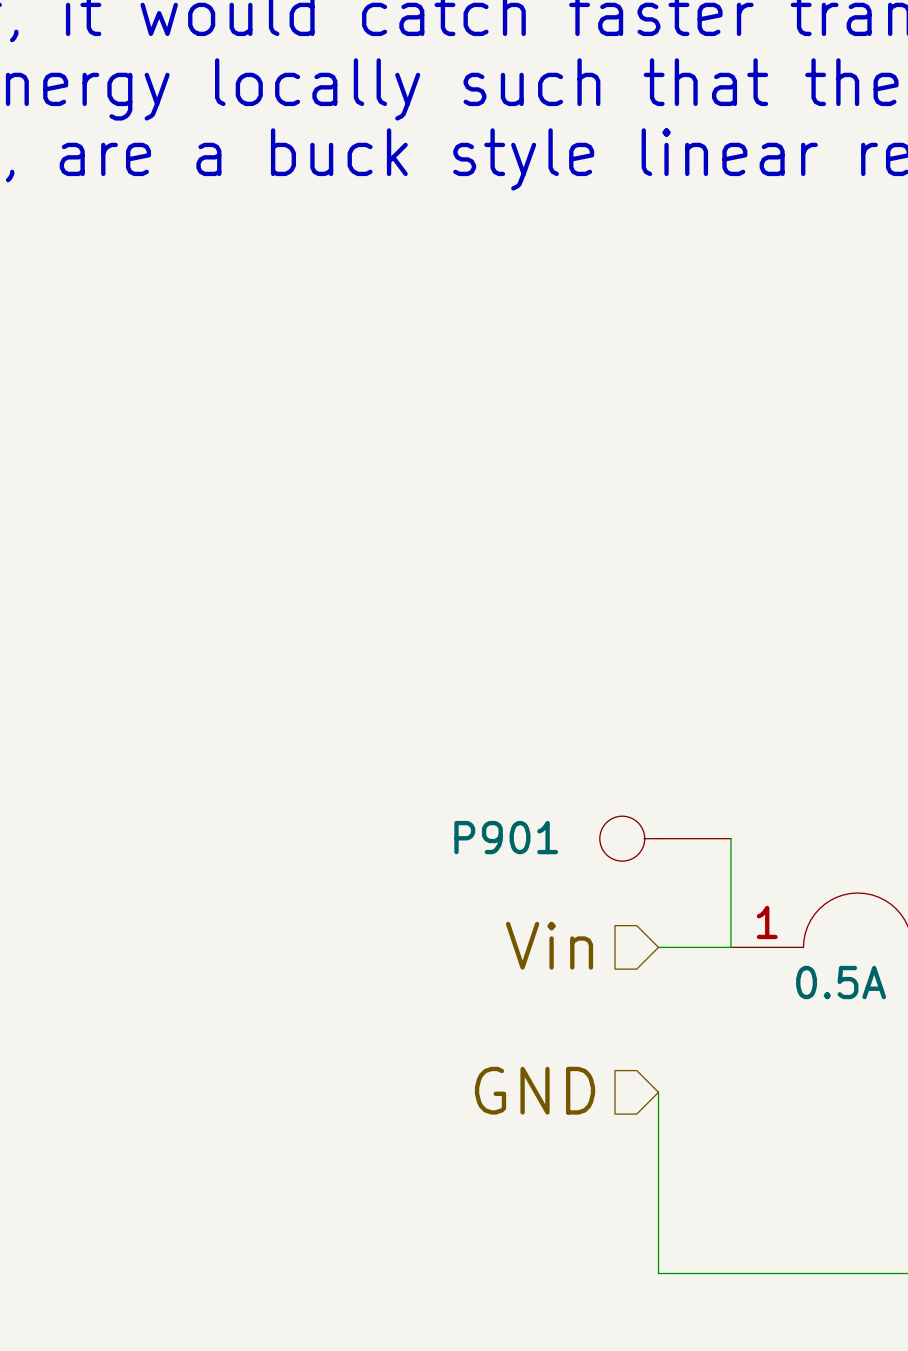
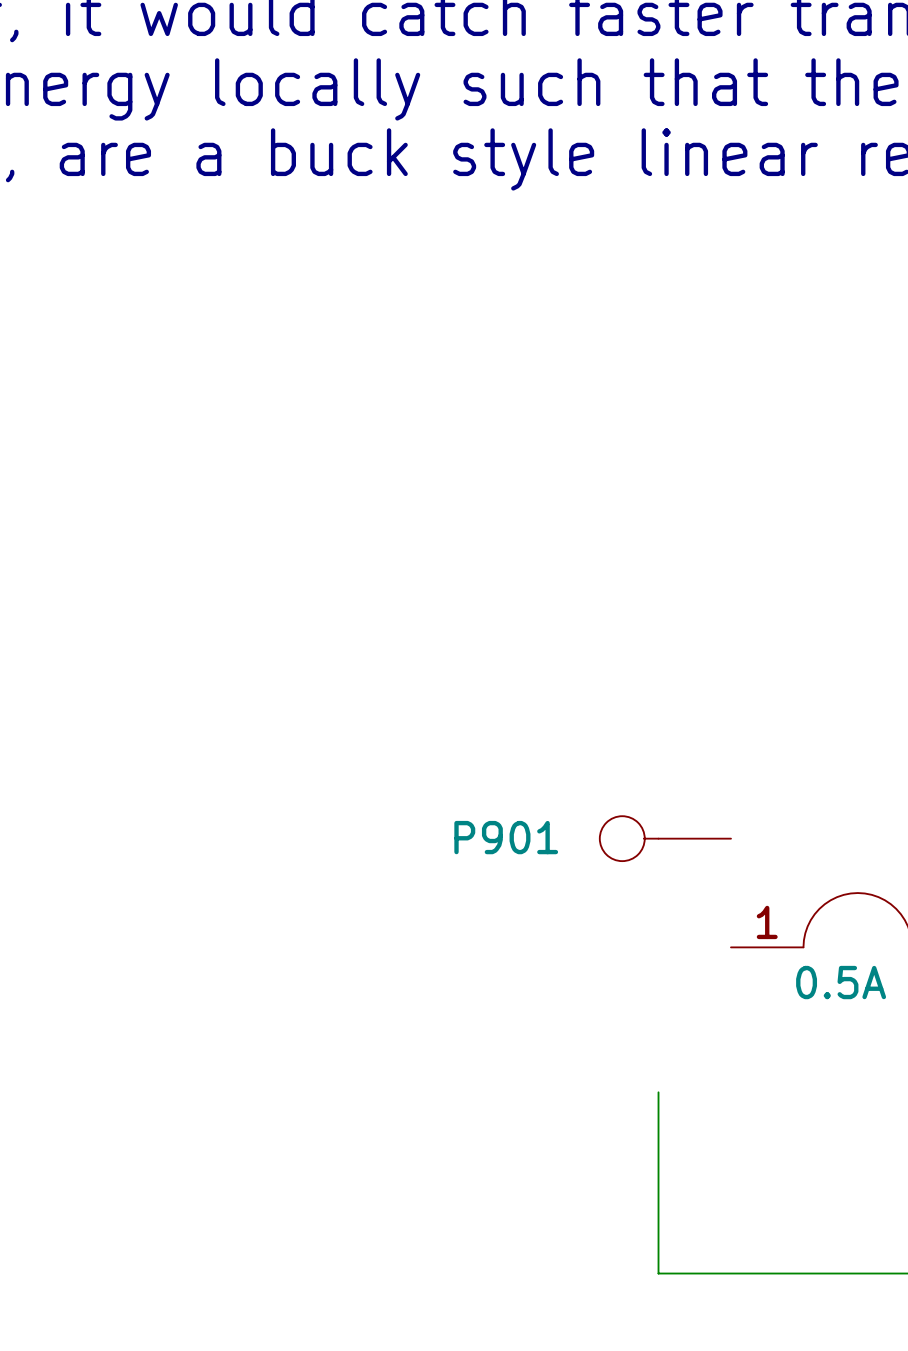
wire: (730, 838) (730, 947) (658, 947) -> none
hierarchical label: Vin (549, 945) -> none
hierarchical label: GND (535, 1090) -> none

